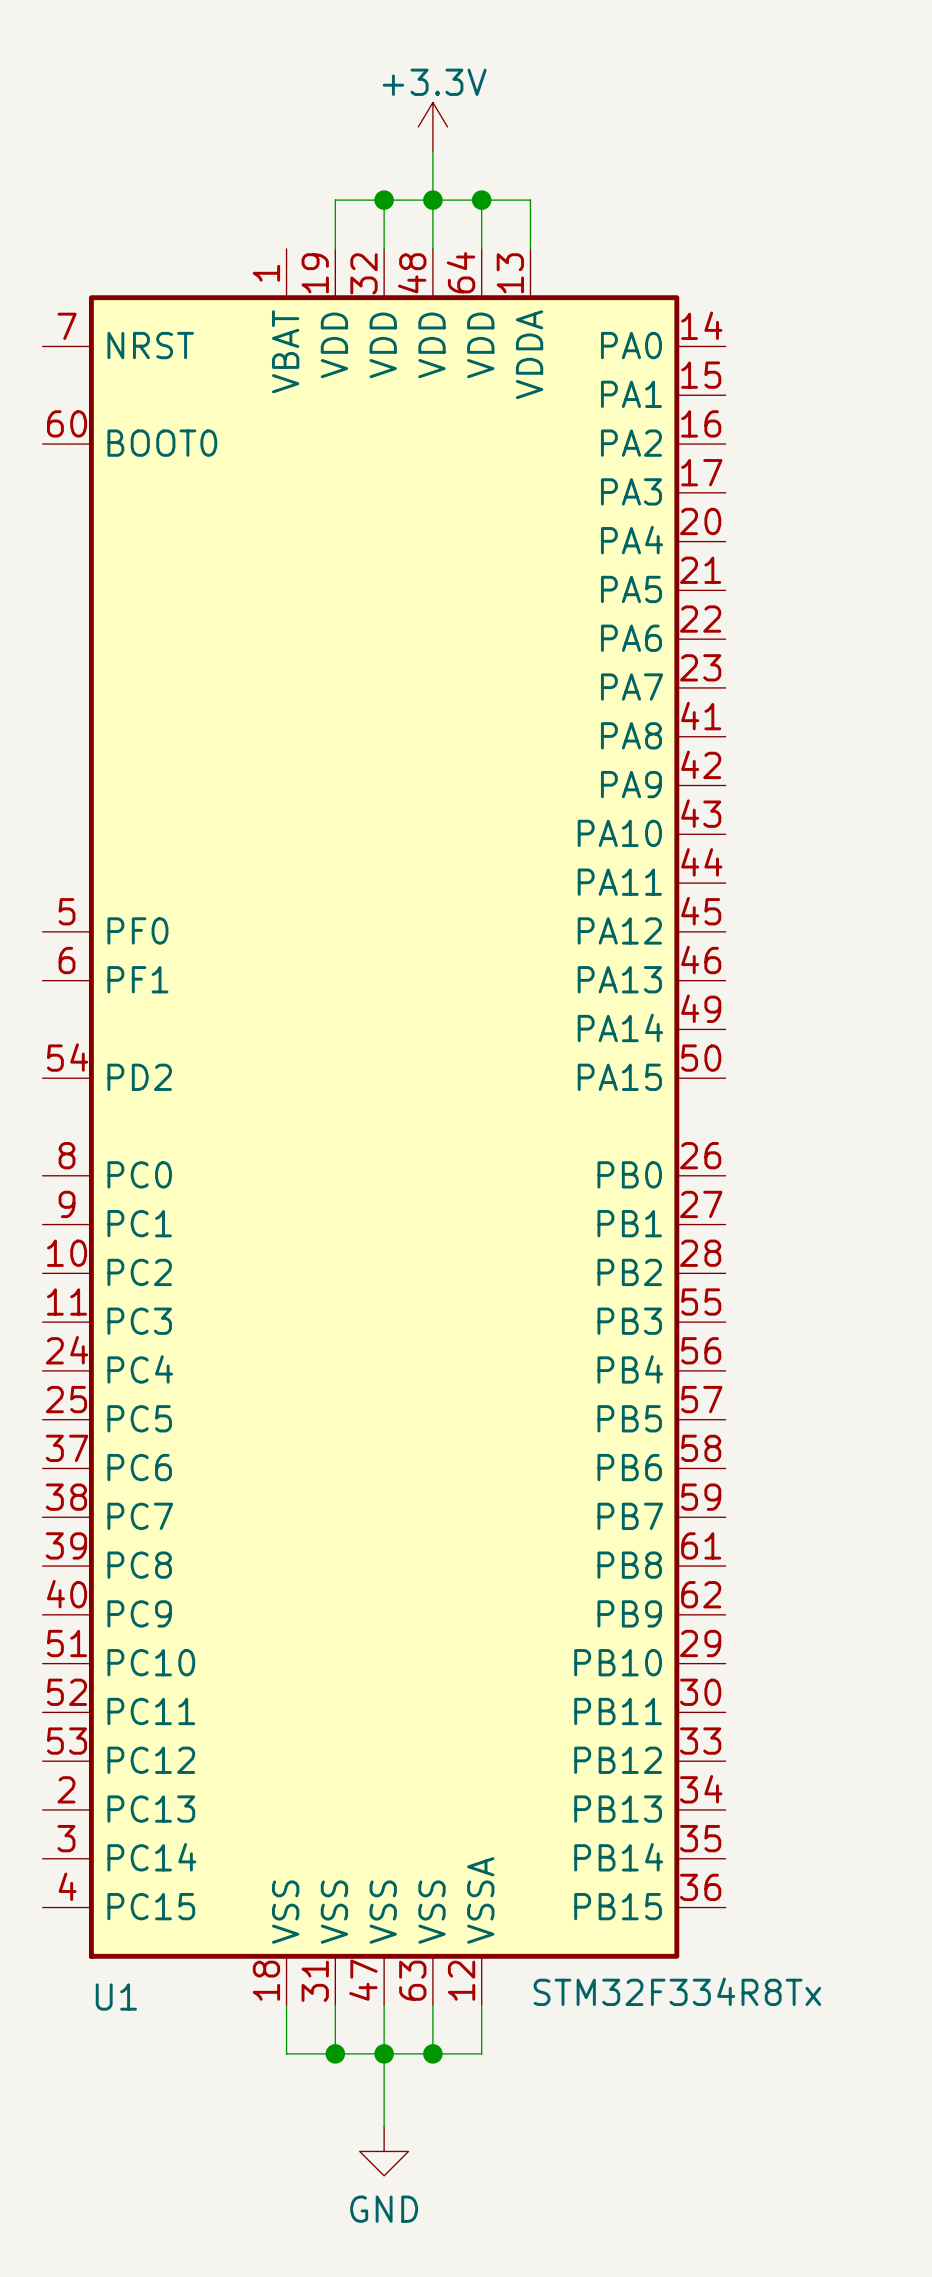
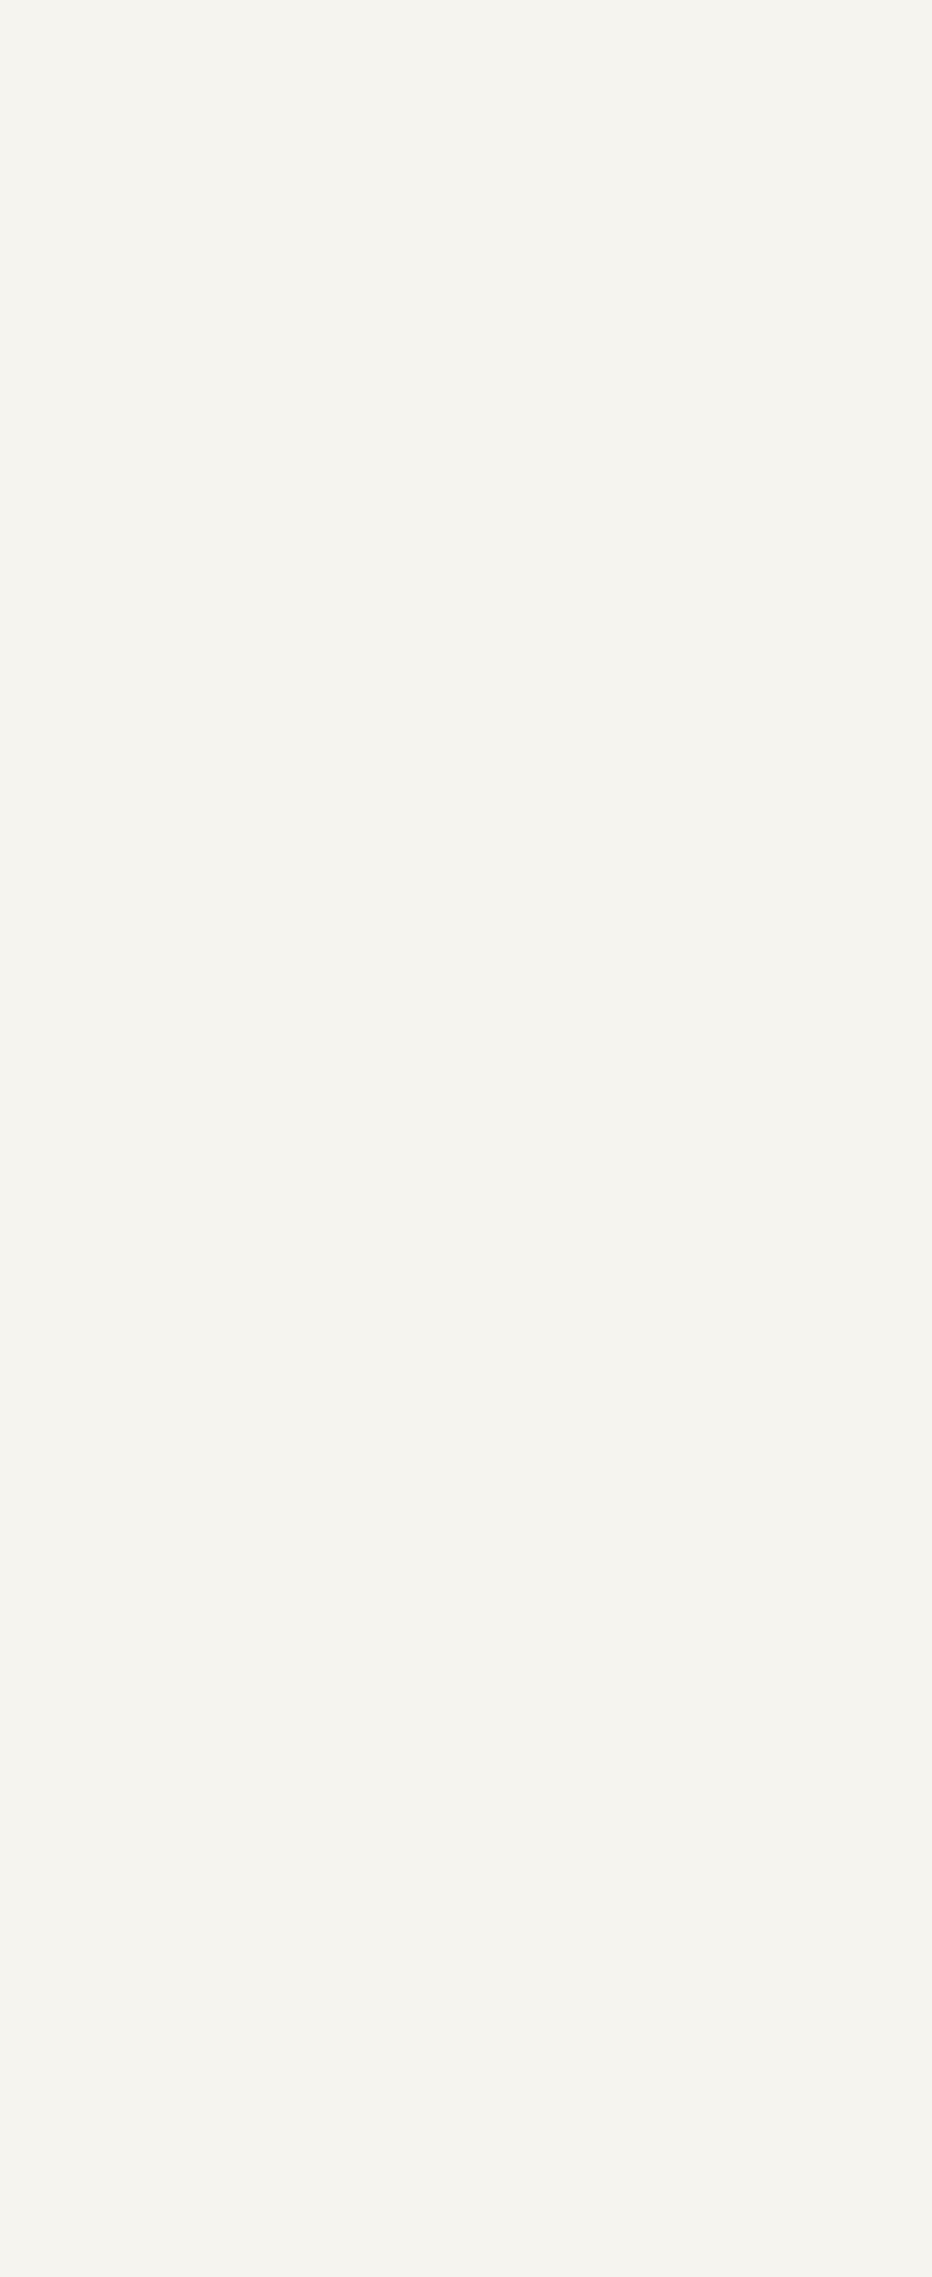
power symbol: +3.3V (432, 126) -> none
wire: (432, 151) (432, 248) -> none
wire: (384, 200) (384, 248) -> none
junction: (384, 200) -> none
junction: (432, 200) -> none
wire: (481, 200) (481, 248) -> none
junction: (481, 200) -> none
wire: (335, 248) (335, 200) (530, 200) (530, 248) -> none
U1: STM32F334R8Tx (384, 1127) -> none
wire: (286, 2005) (286, 2053) (481, 2053) (481, 2005) -> none
wire: (335, 2005) (335, 2053) -> none
wire: (384, 2005) (384, 2127) -> none
wire: (432, 2005) (432, 2053) -> none
junction: (335, 2053) -> none
junction: (384, 2053) -> none
junction: (432, 2053) -> none
power symbol: GND (384, 2151) -> none

